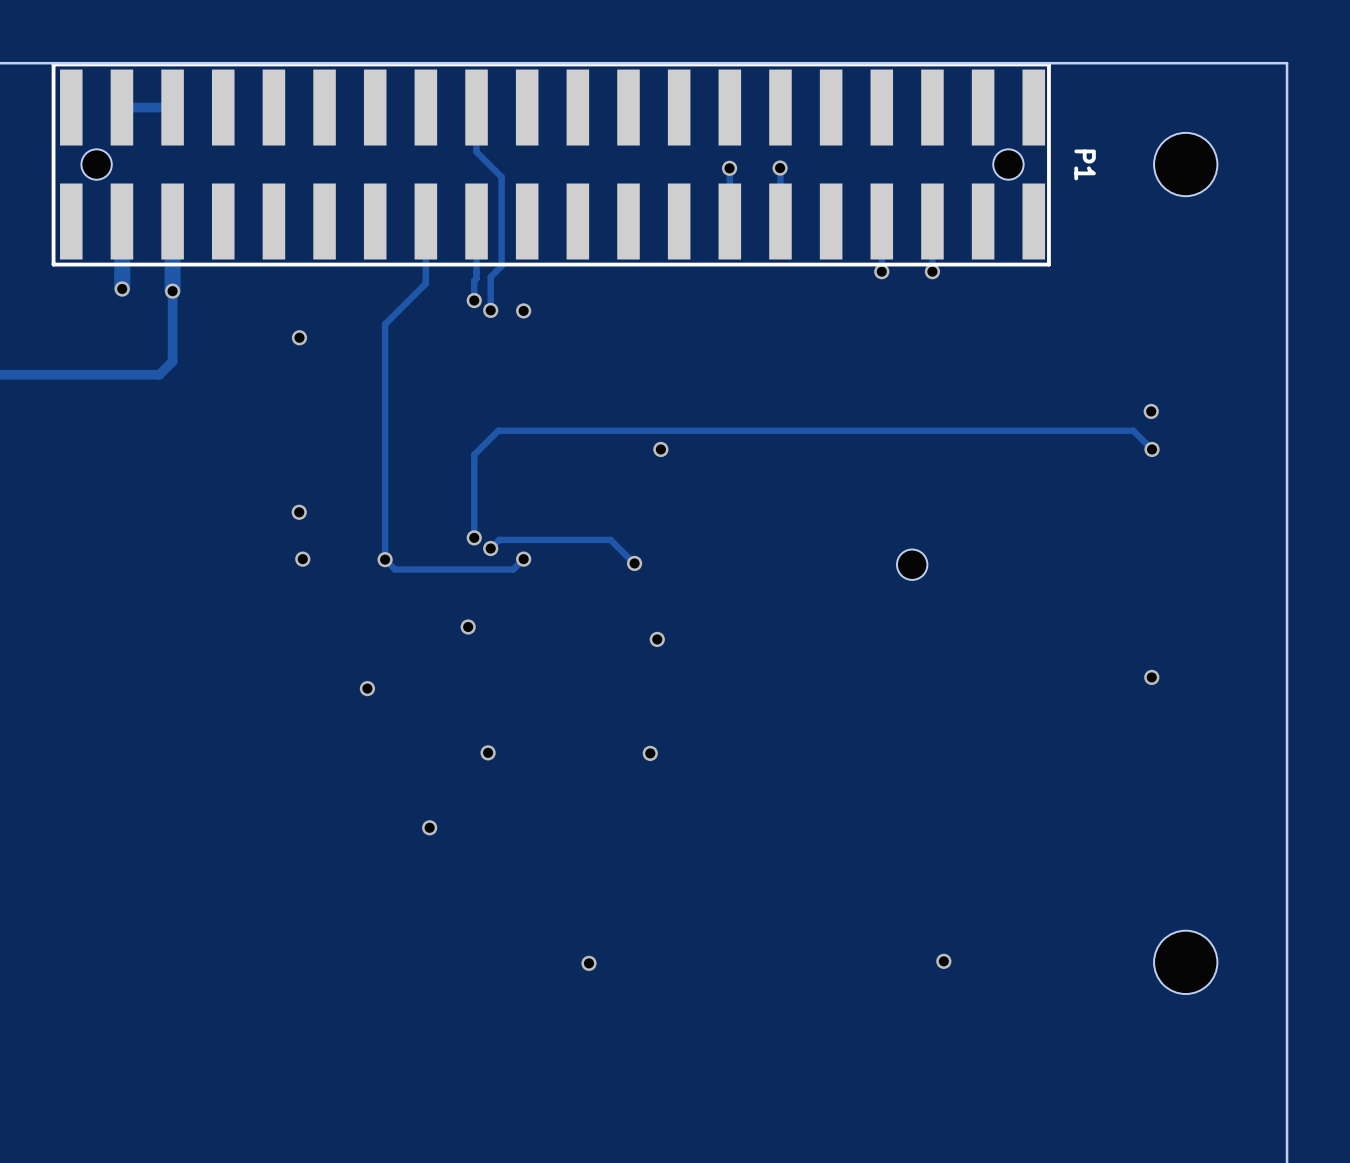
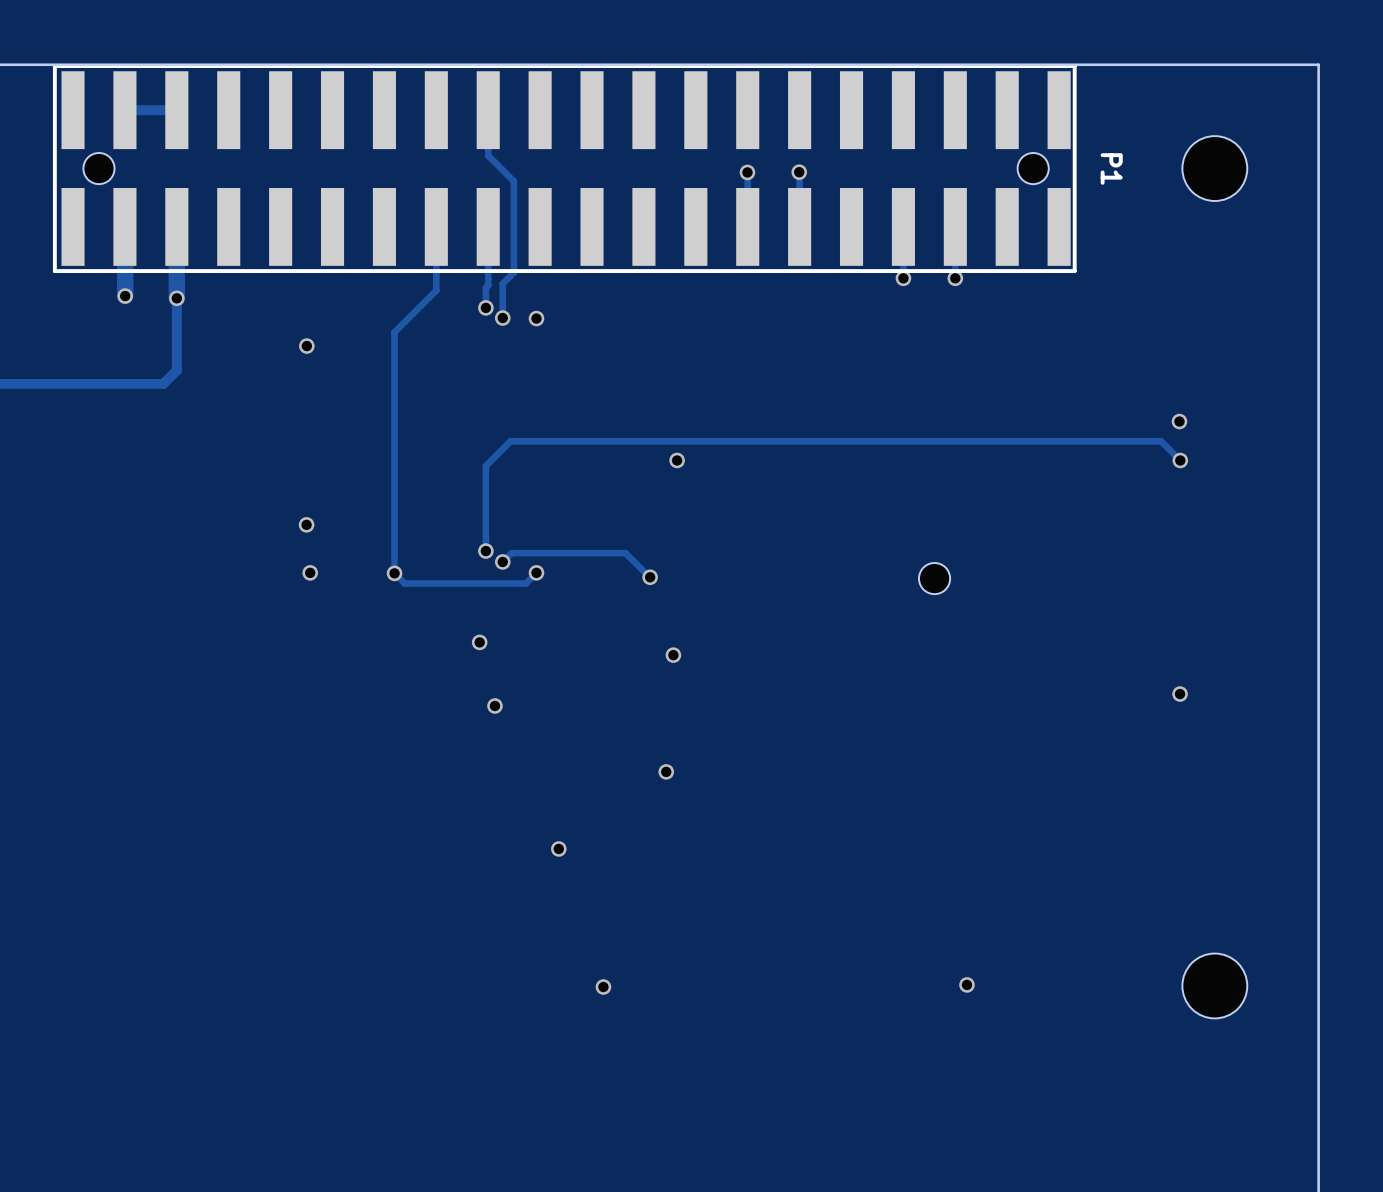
via: (367, 688) -> none
via: none -> (494, 705)
via: (488, 752) -> none
via: (429, 827) -> none
via: none -> (558, 848)

